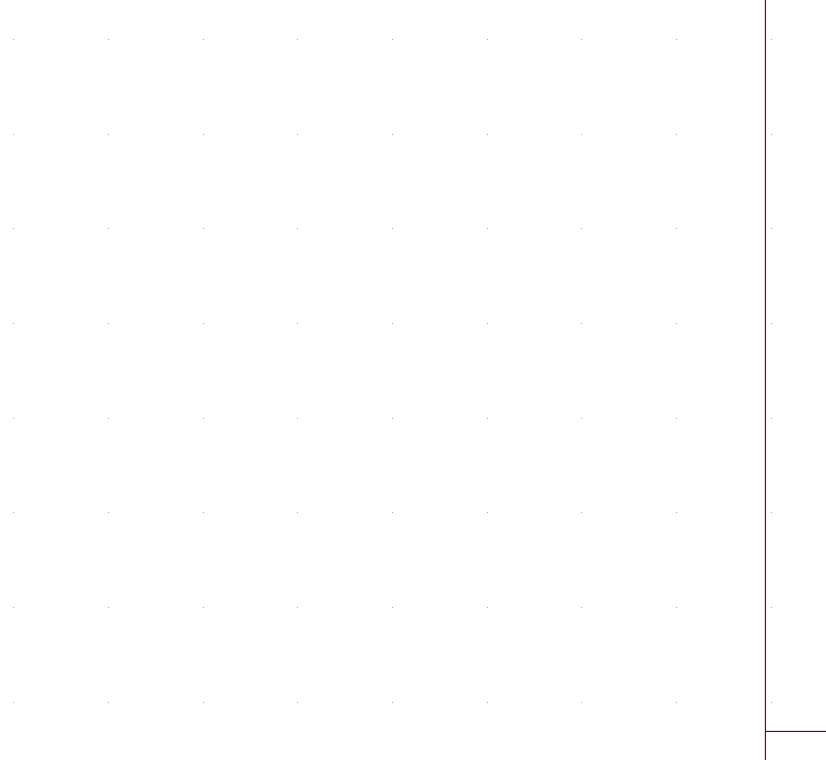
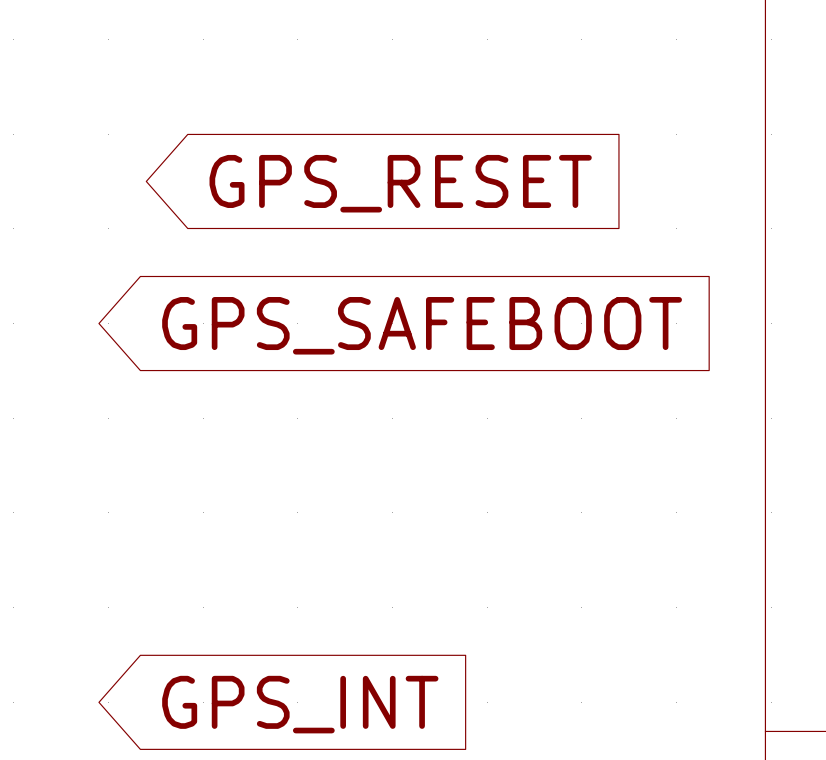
global label: none -> GPS_RESET (400, 183)
global label: none -> GPS_SAFEBOOT (422, 325)
global label: none -> GPS_INT (300, 704)

